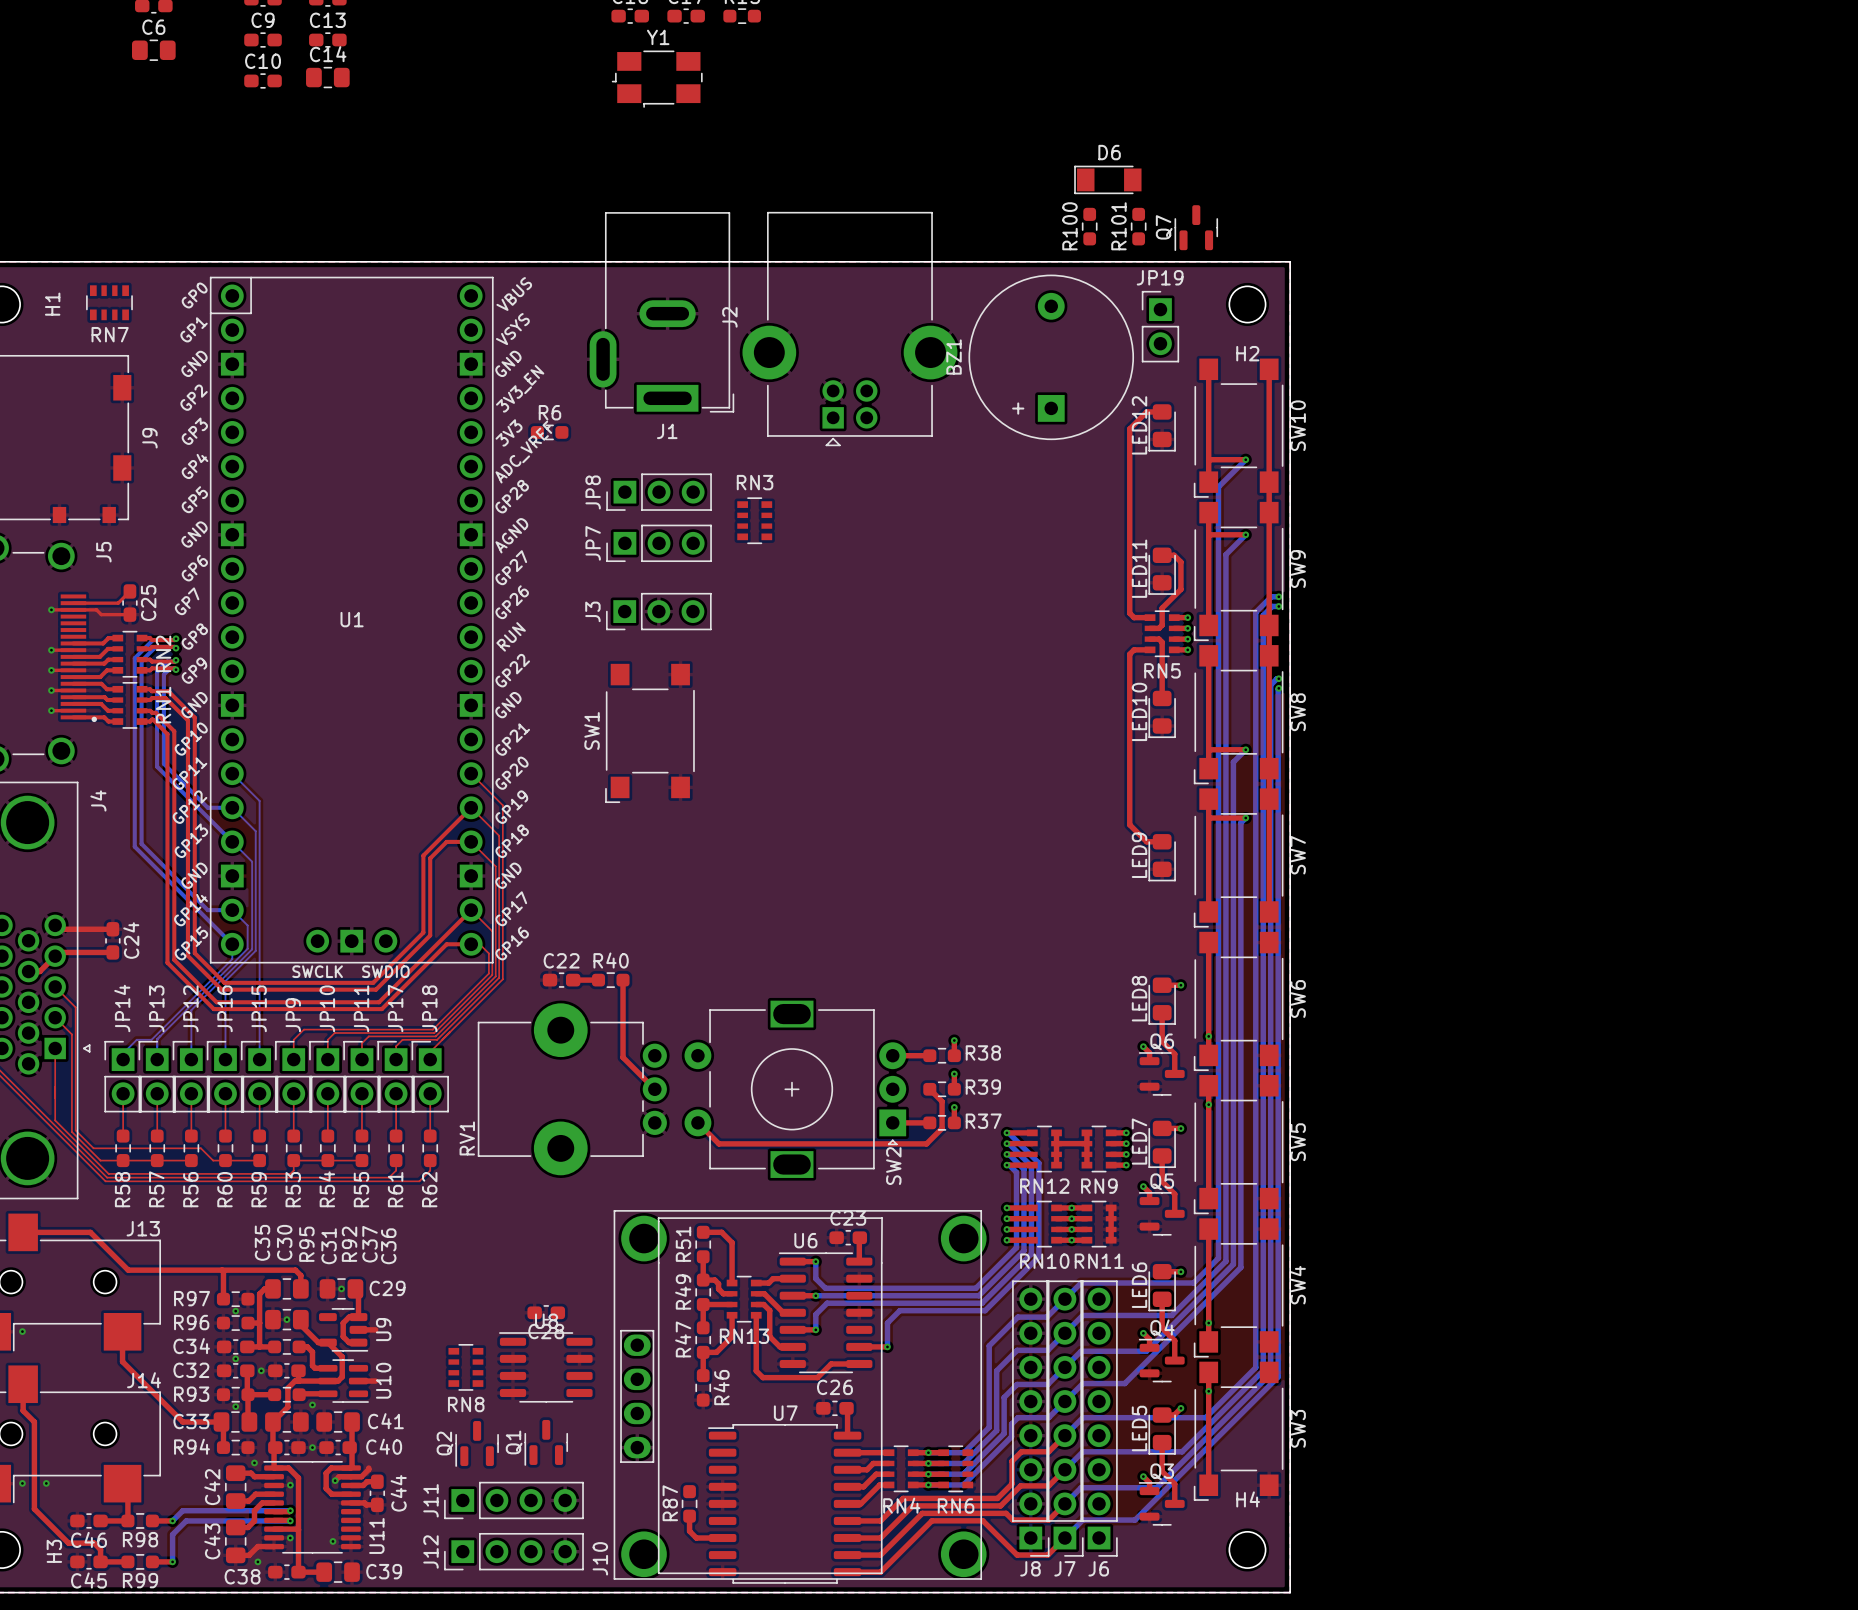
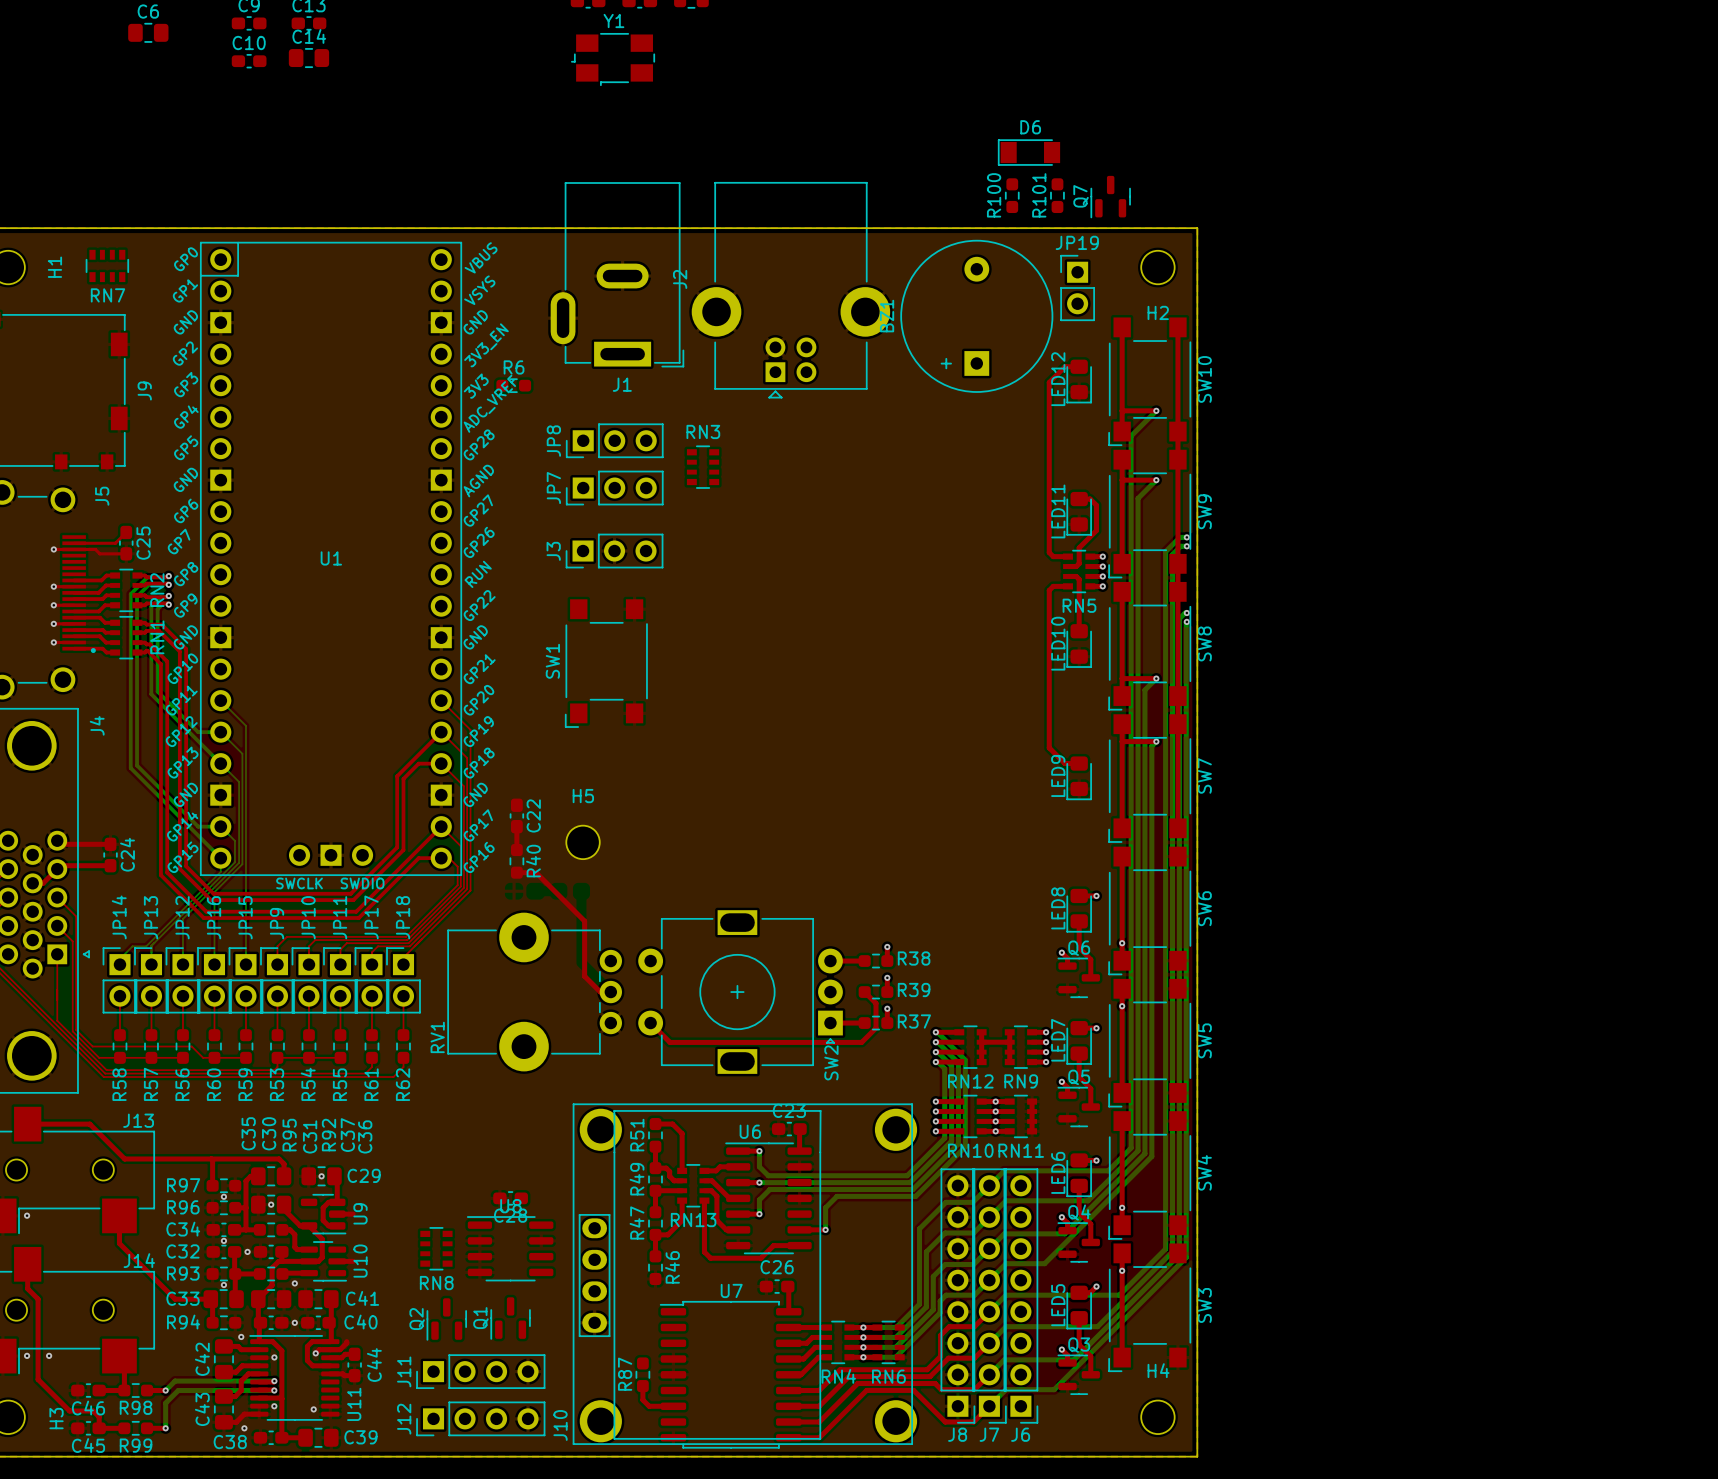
top track: none -> (516, 826) (516, 850)
H5: none -> (583, 842)
C22 rotation: 0° (561, 980) -> 90° clockwise (516, 815)
C22 position: (561, 980) -> (516, 815)
top track: (573, 980) (598, 980) -> none
R40 rotation: 0° (610, 980) -> 90° clockwise (516, 861)
R40 position: (610, 980) -> (516, 861)
top track: (623, 980) (623, 1057) (654, 1089) -> (516, 872) (536, 872) (584, 921) (584, 976) (600, 992) (610, 992)

